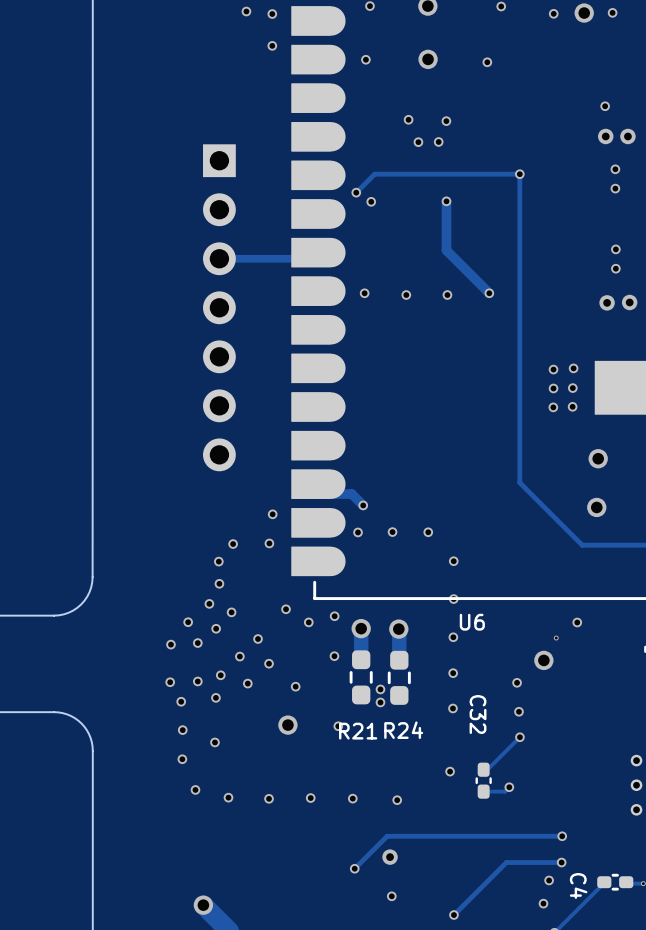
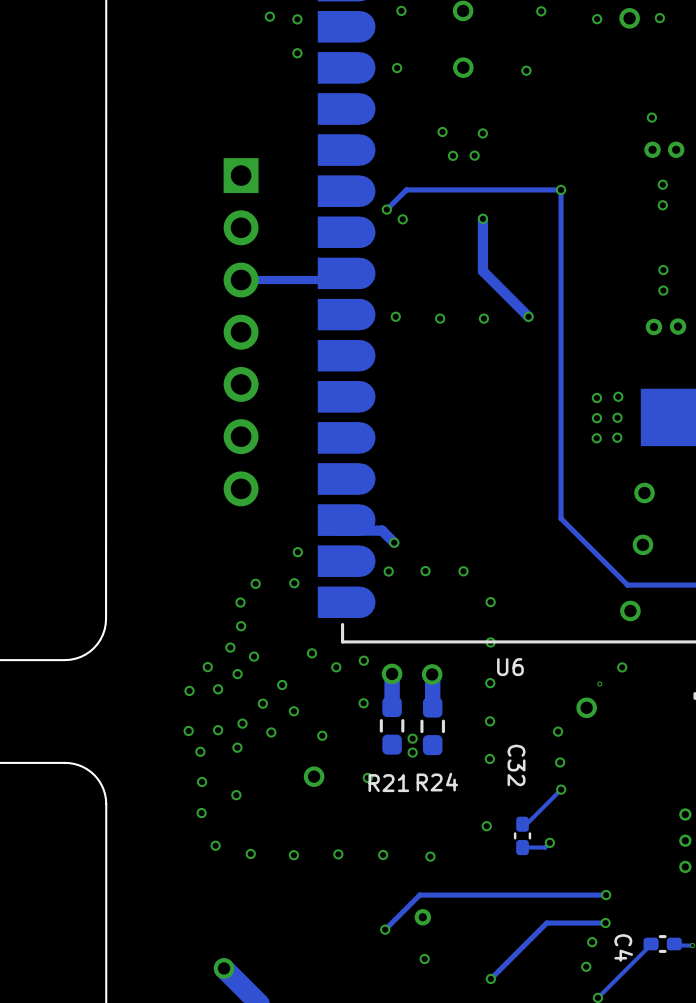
via: none -> (630, 610)

